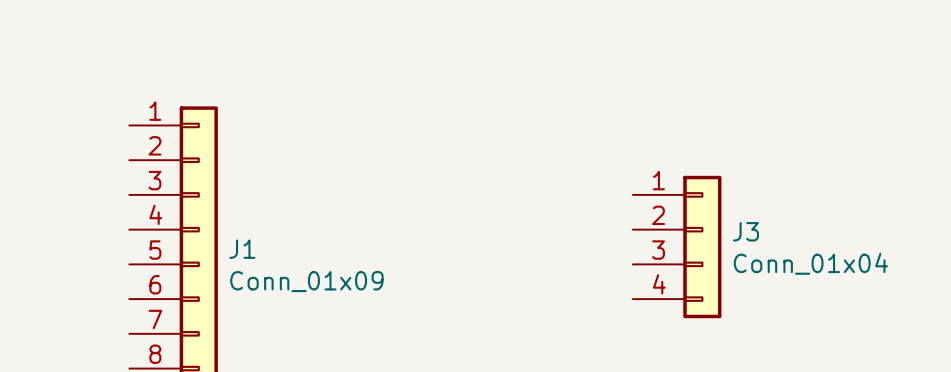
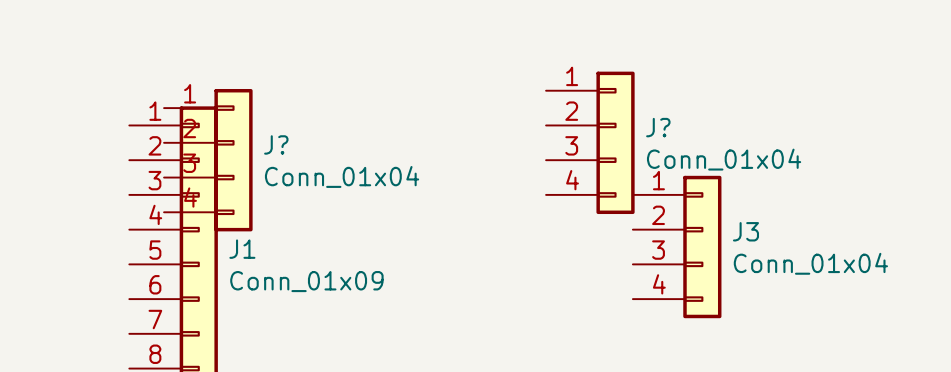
J?: none -> Conn_01x04 (590, 142)
J?: none -> Conn_01x04 (208, 160)

